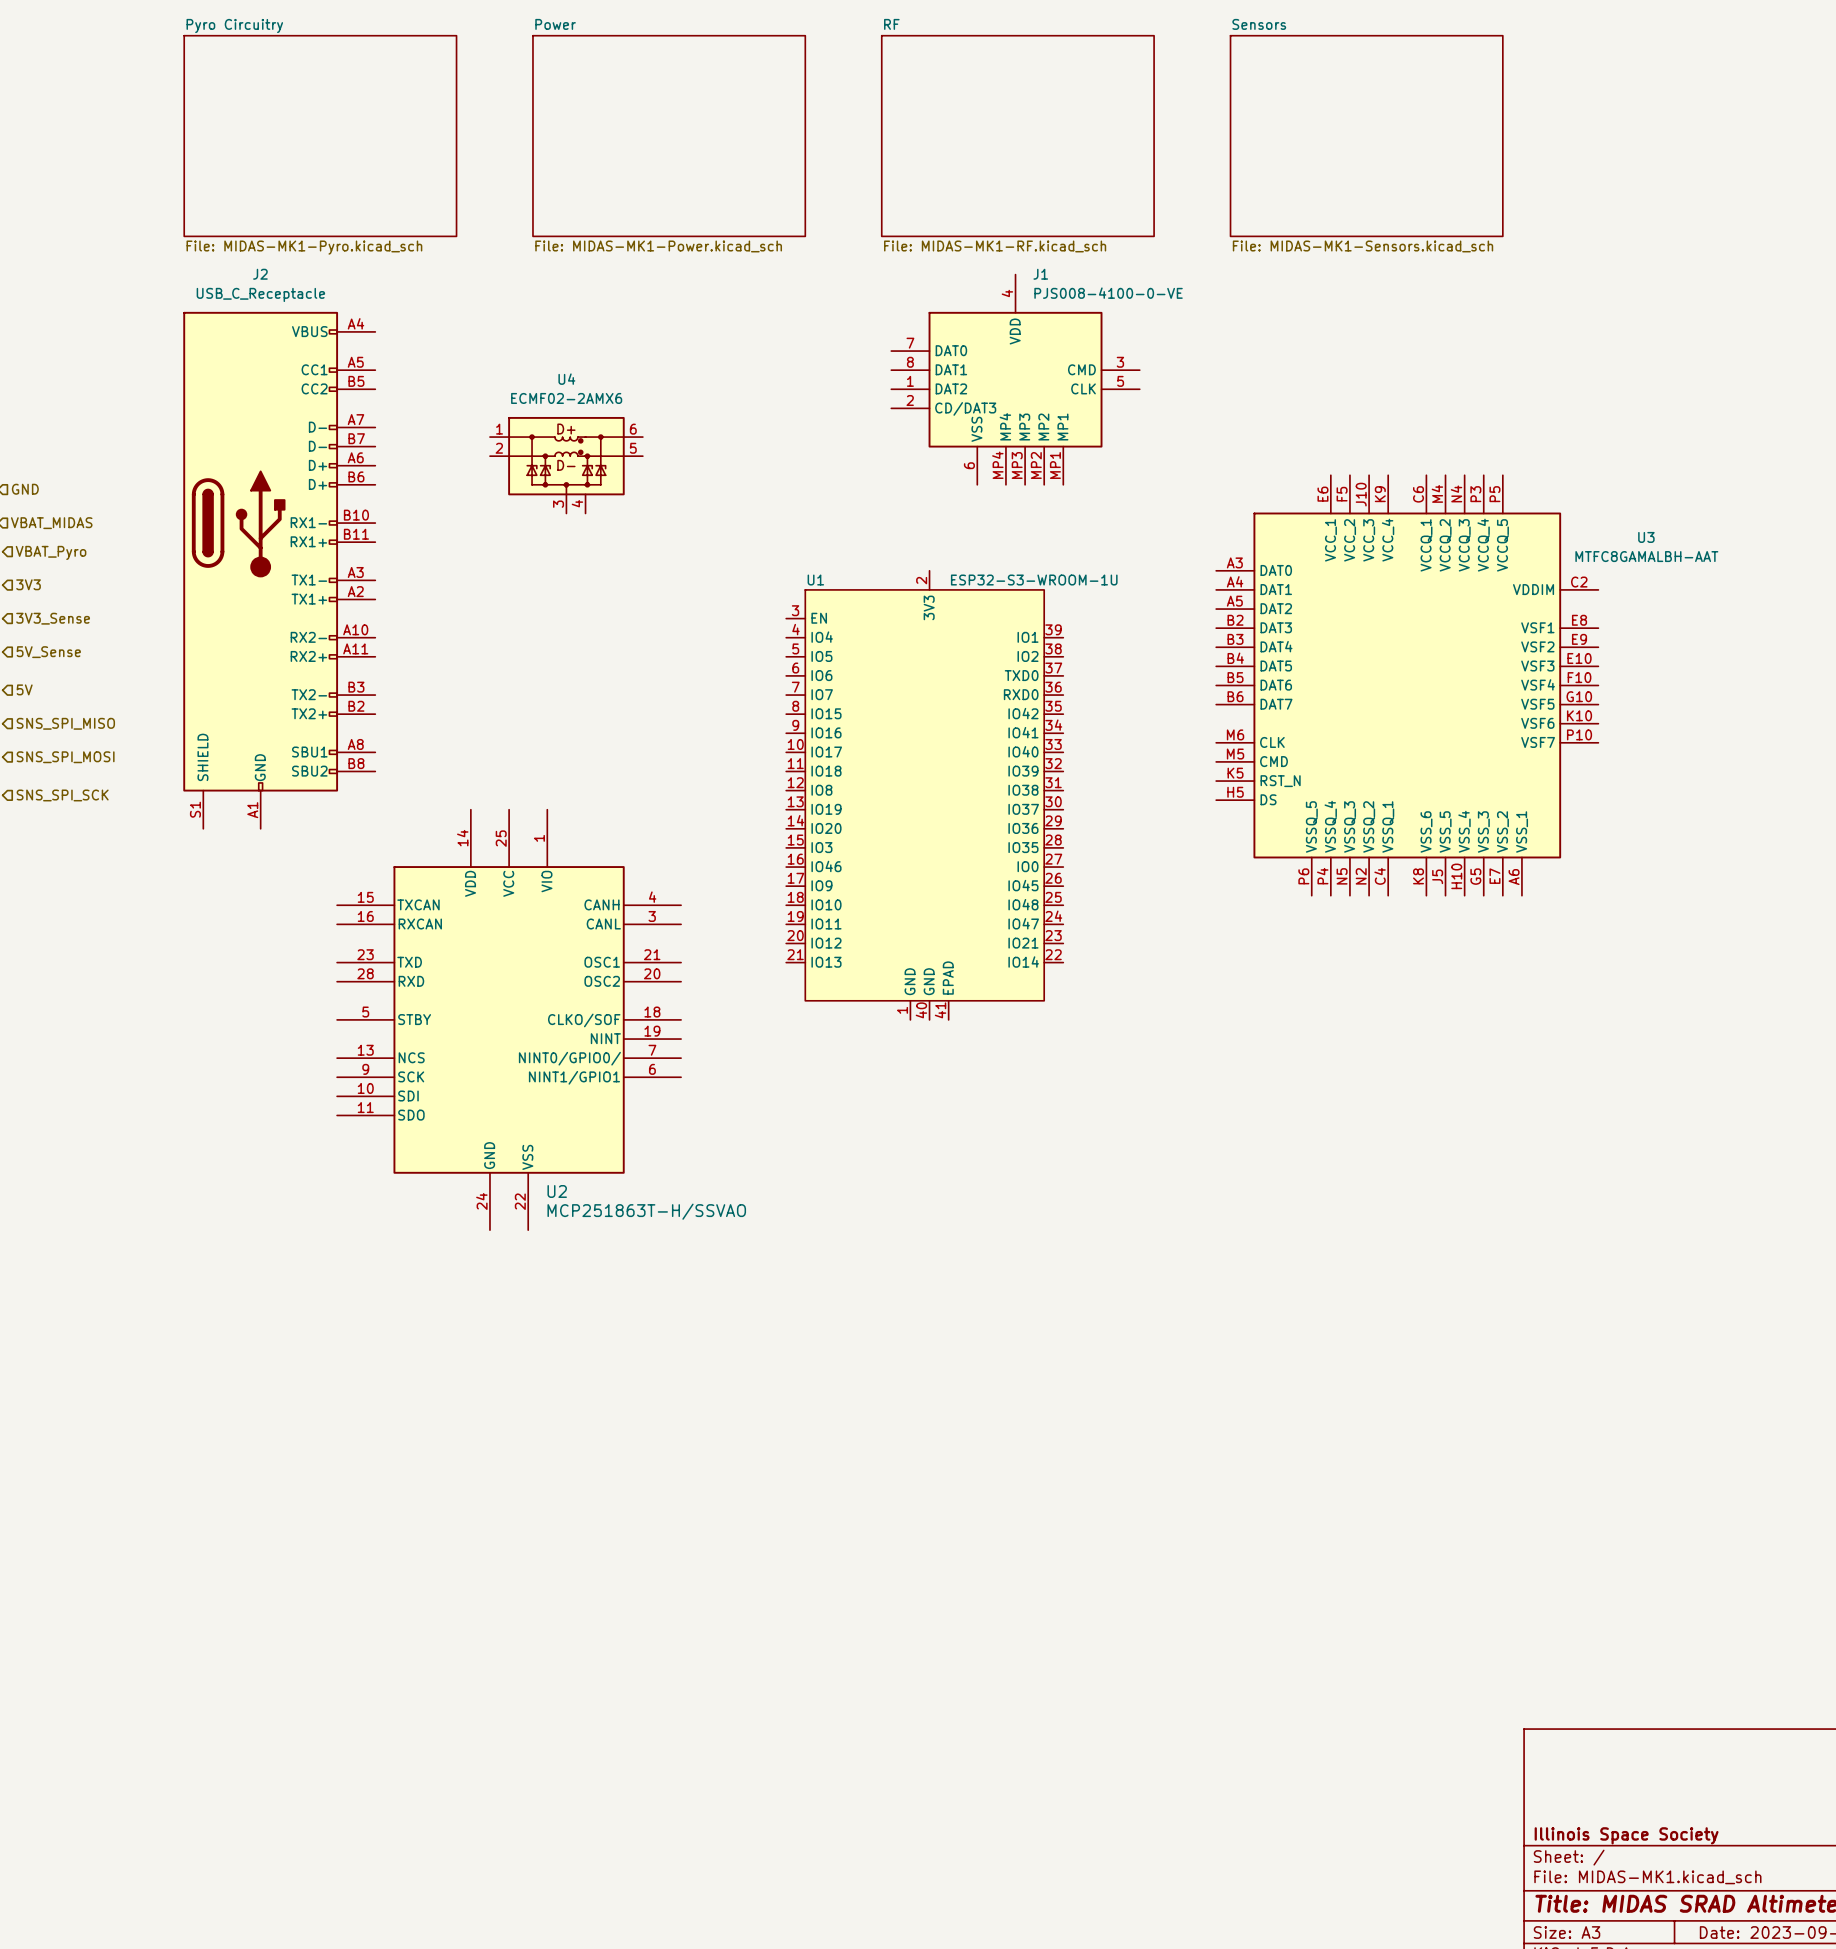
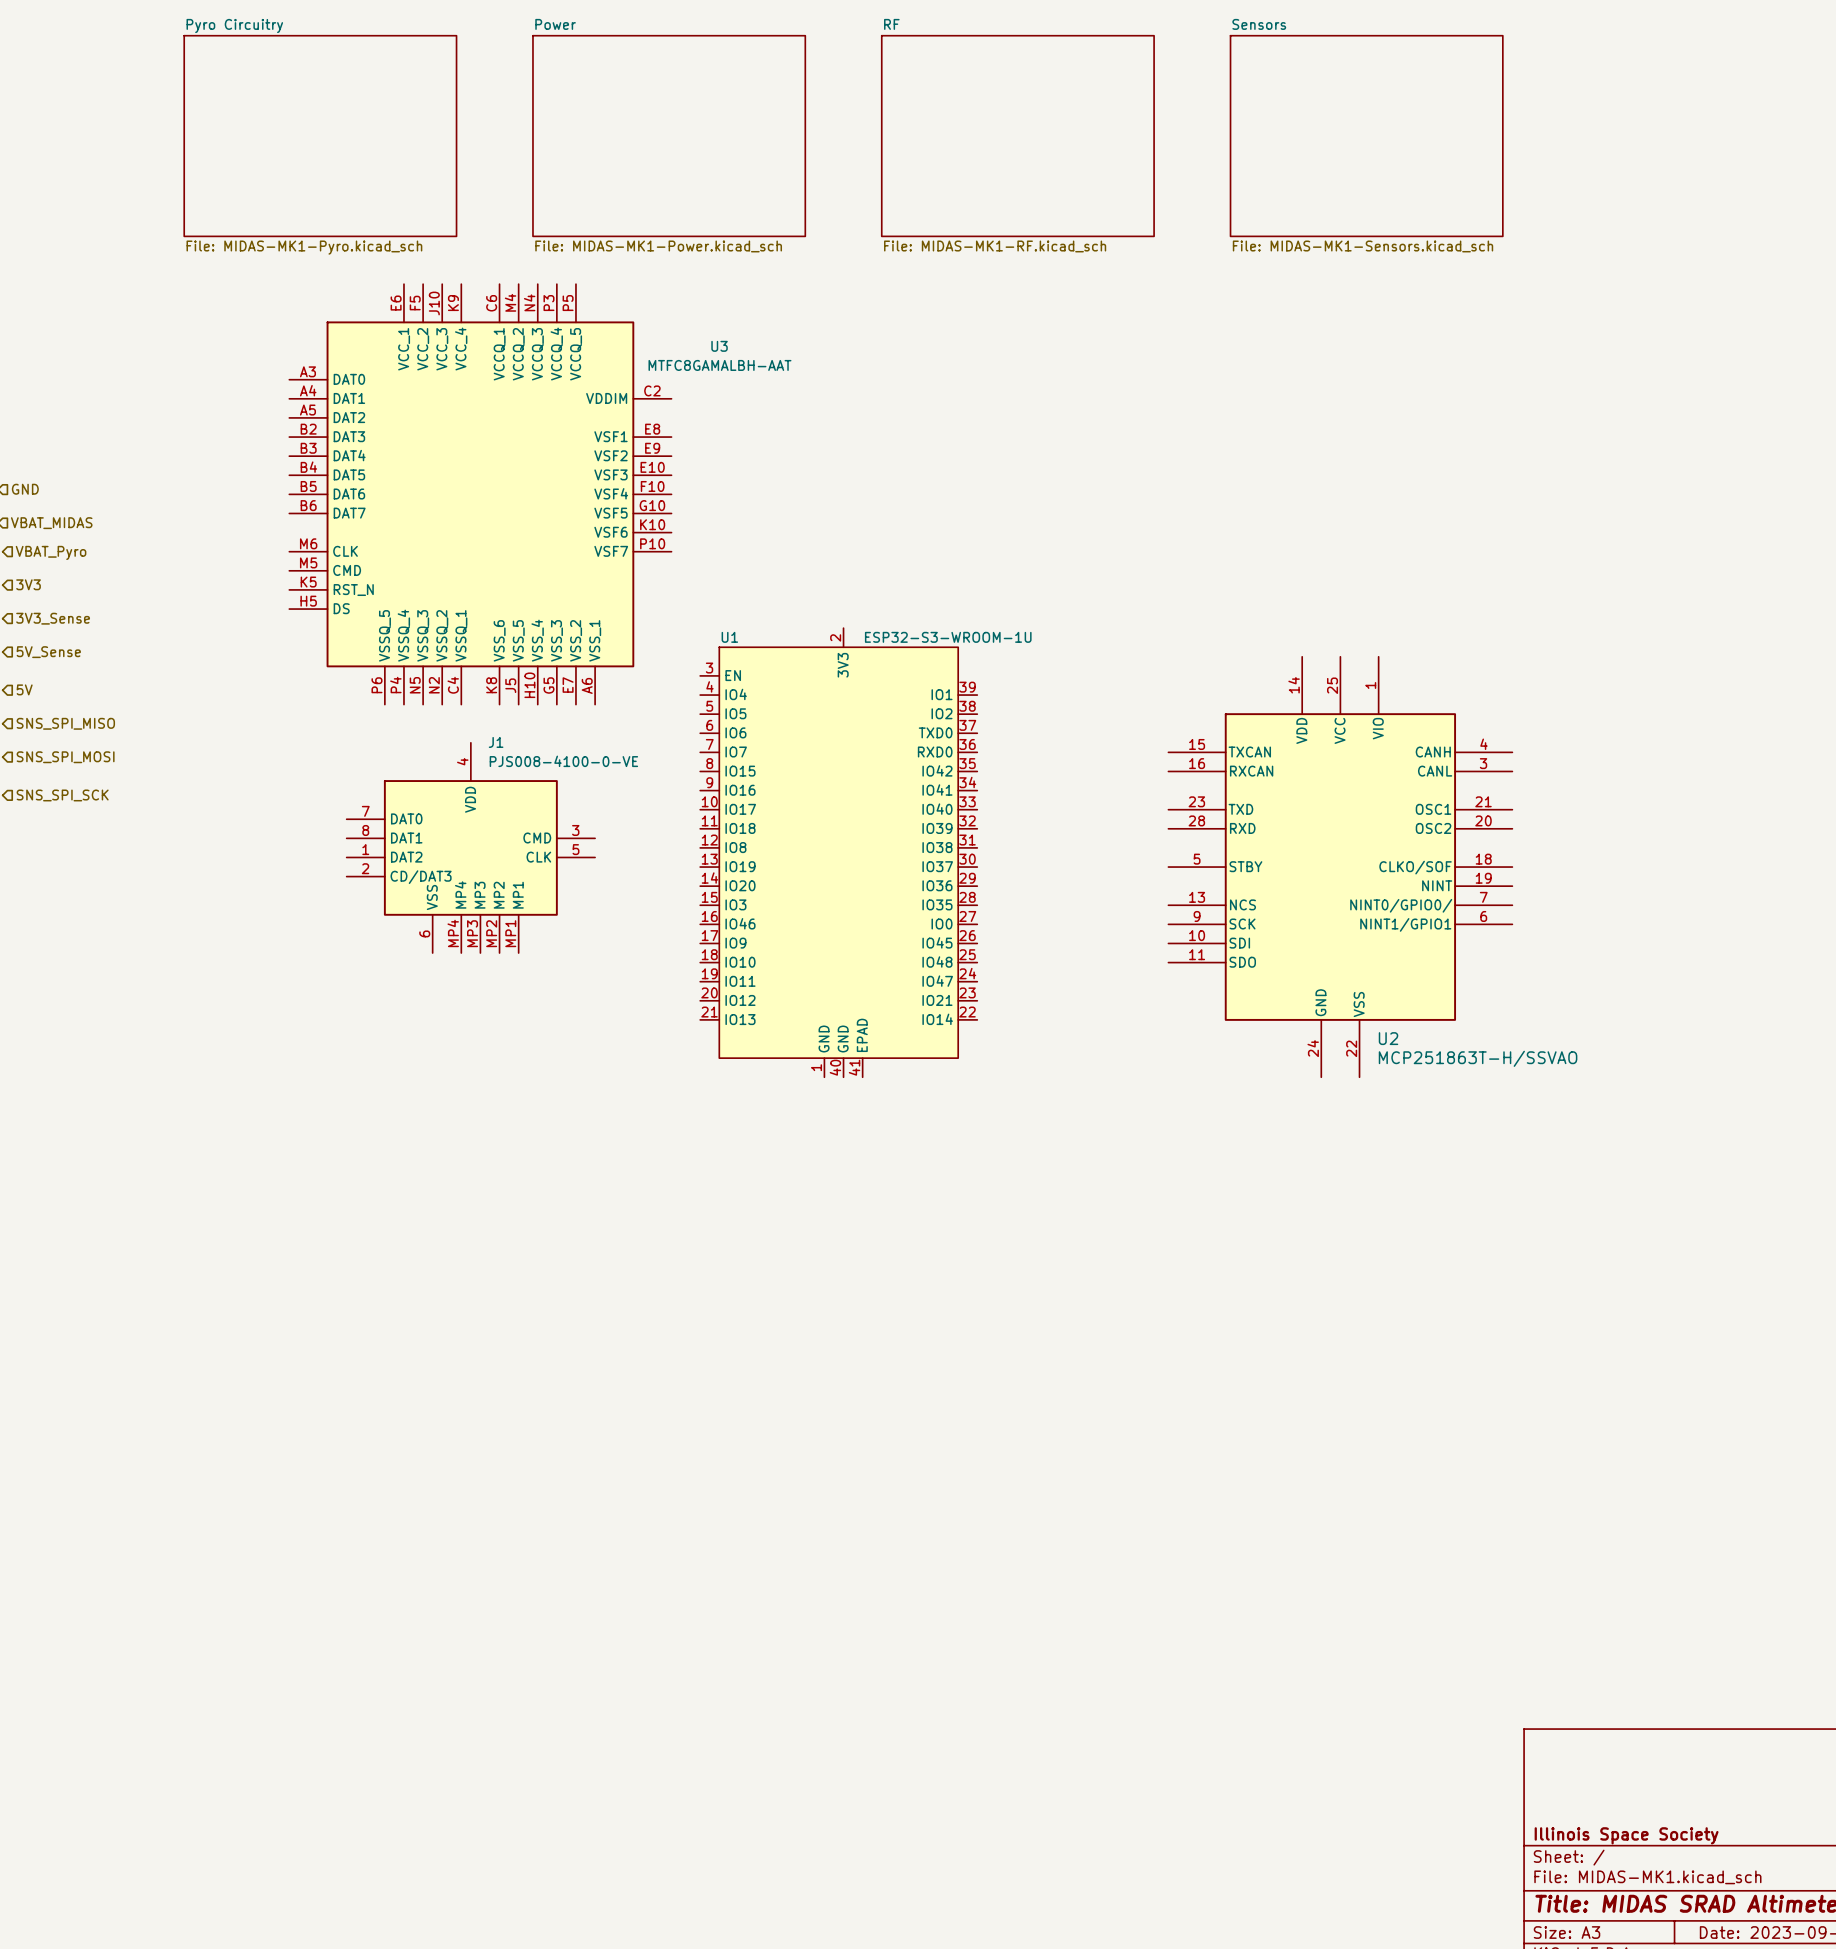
J1 position: (1015, 379) -> (470, 847)
U4: ECMF02-2AMX6 (566, 465) -> none
J2: USB_C_Receptacle (279, 570) -> none
U3 position: (1407, 685) -> (480, 494)
U1 position: (924, 795) -> (838, 852)
U2 position: (509, 1019) -> (1340, 867)

